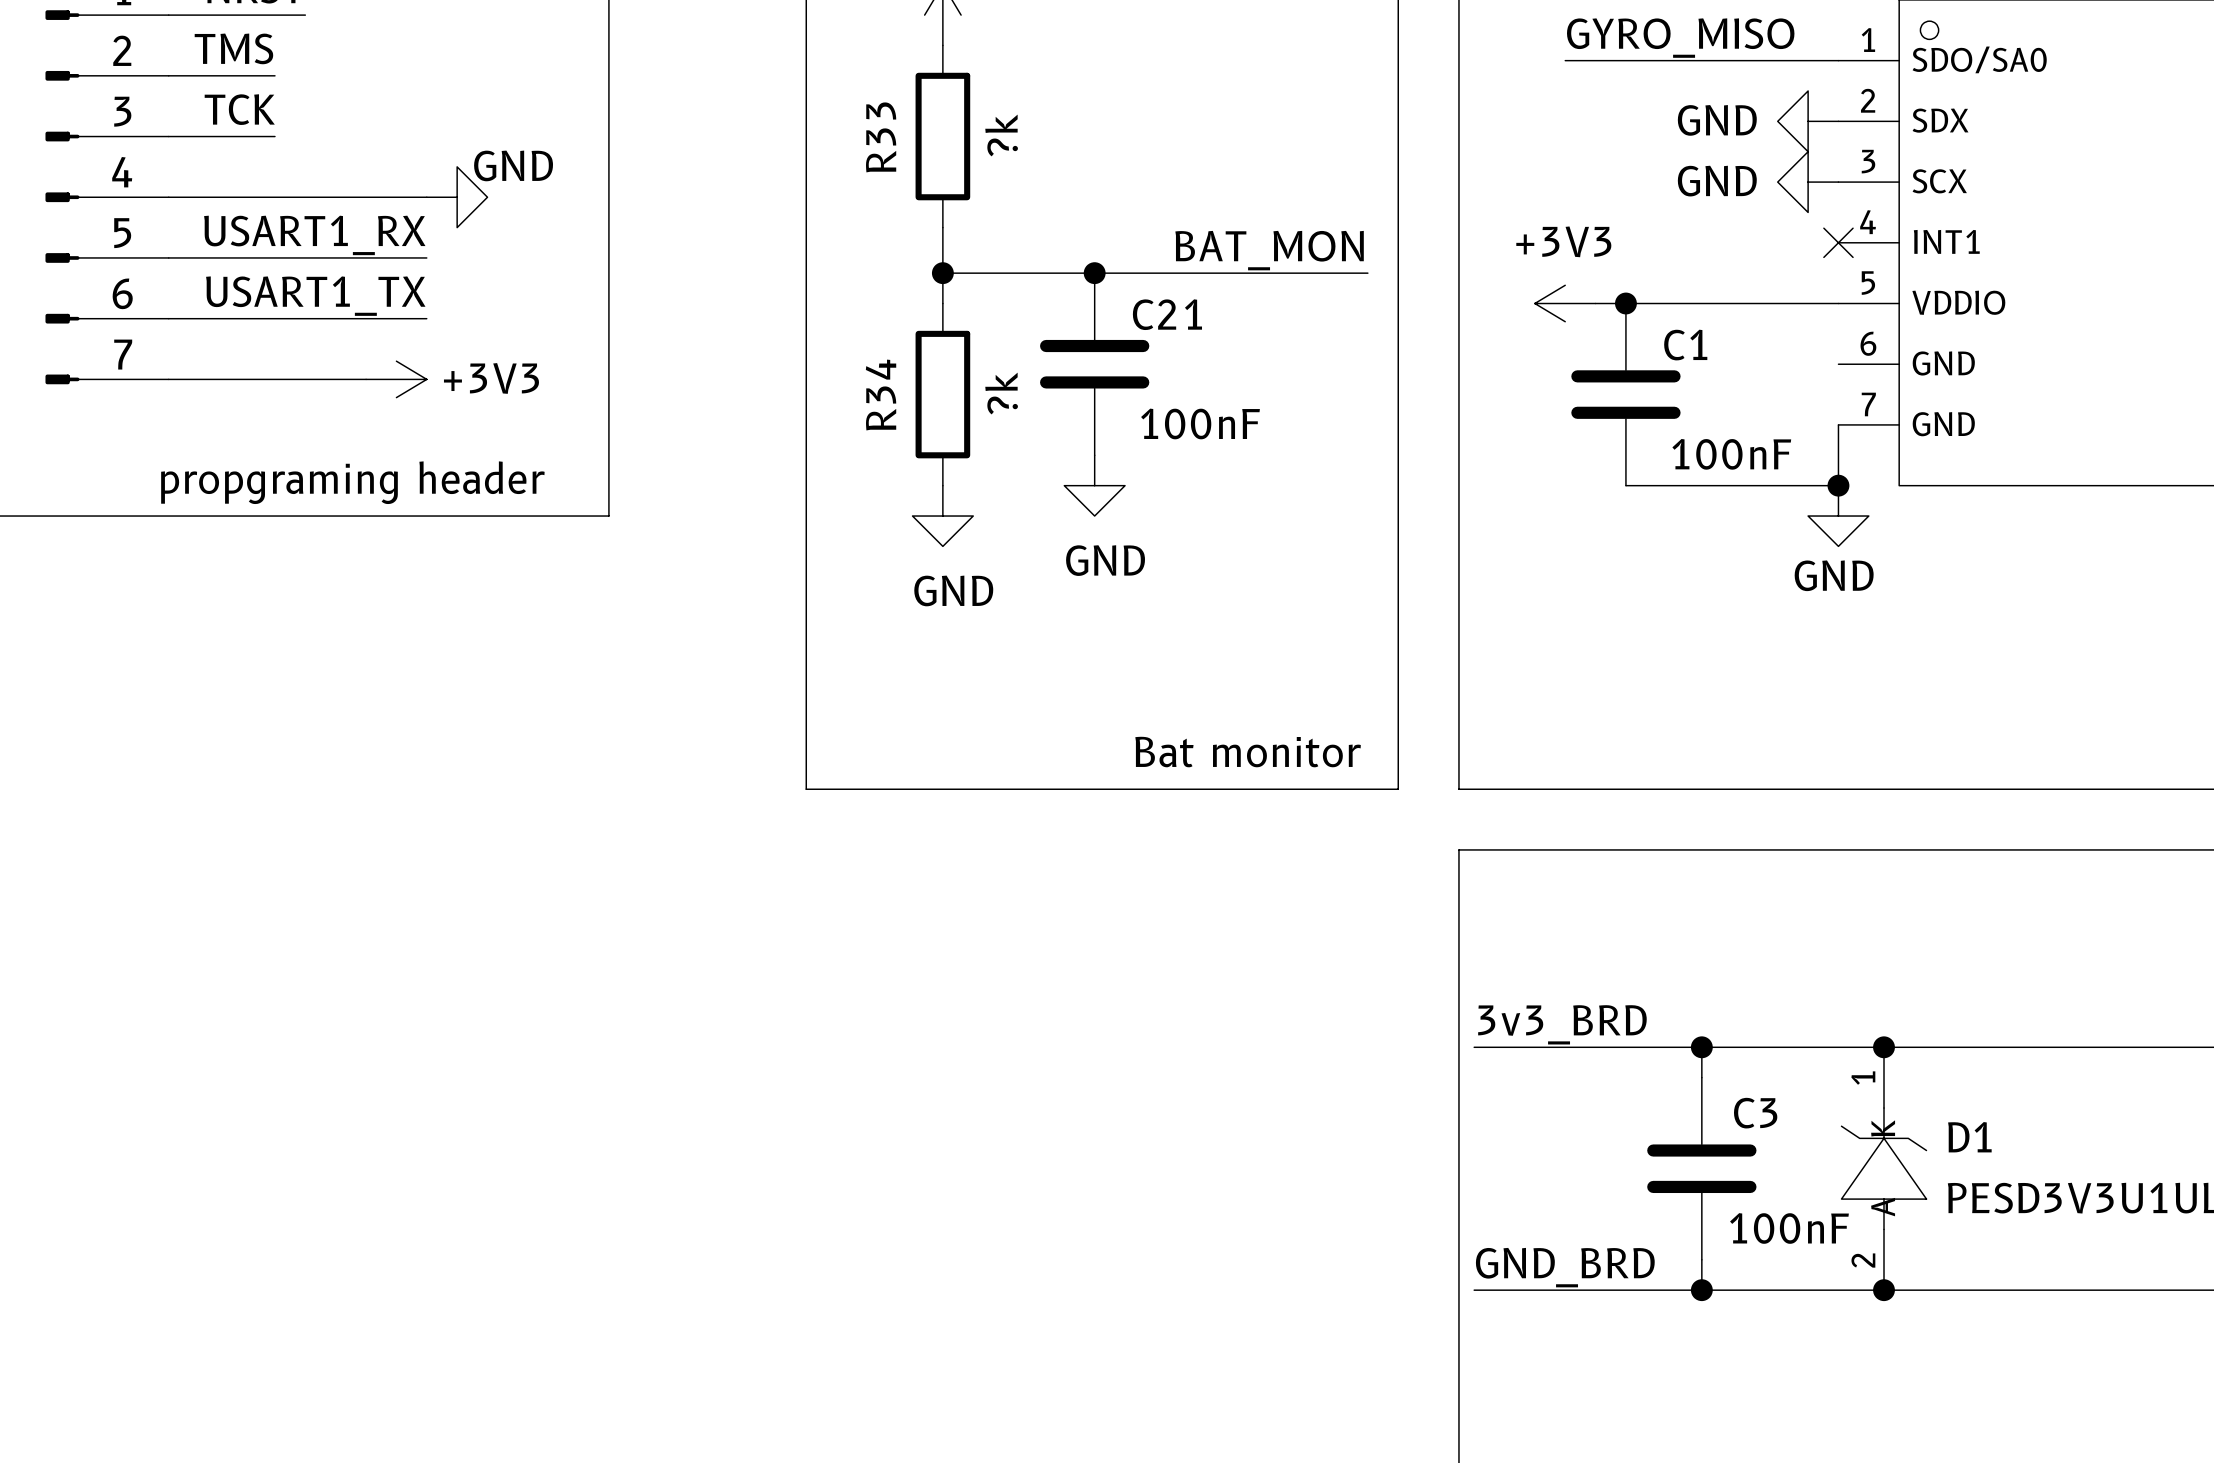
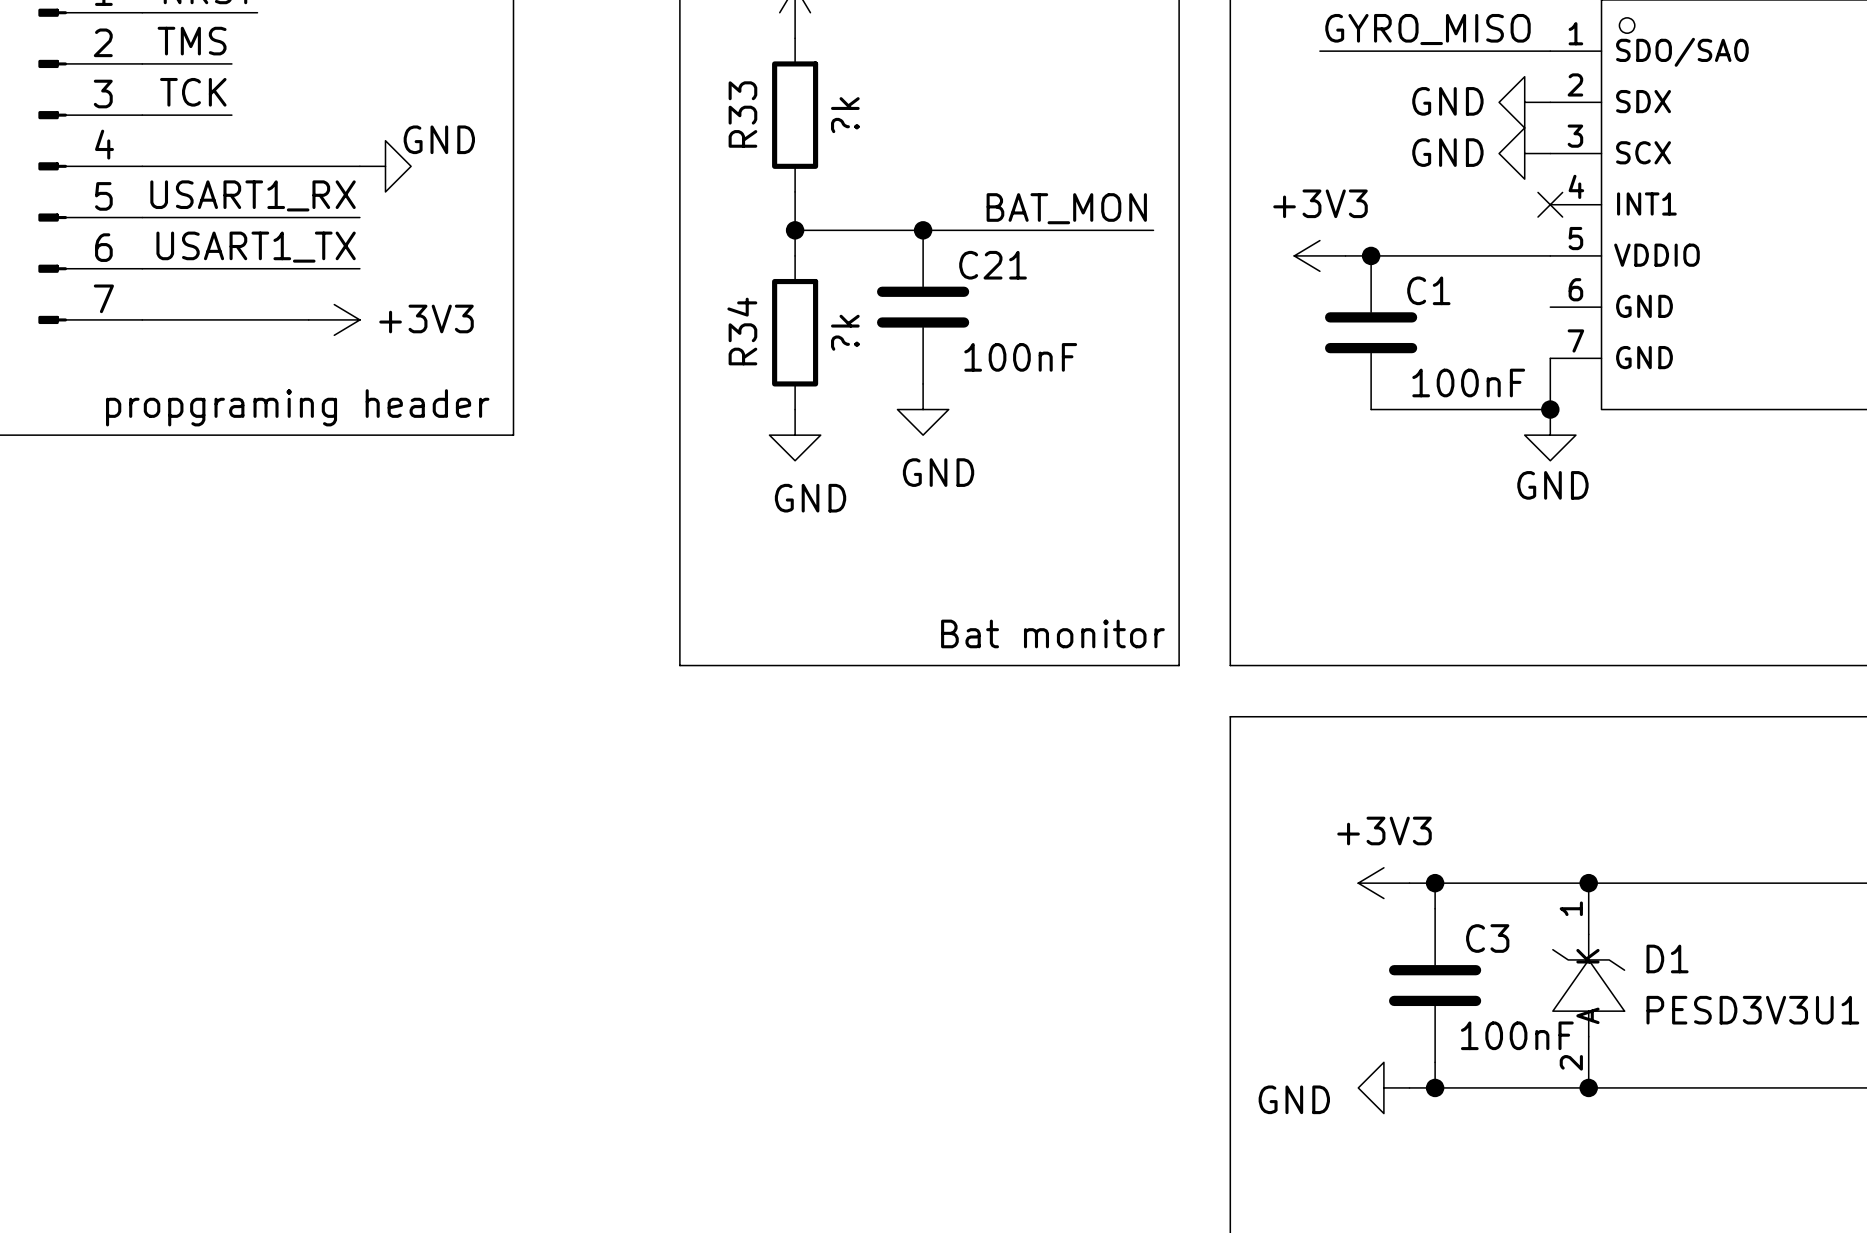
label: 3v3_BRD (1562, 1024) -> none
wire: (1474, 1047) (1671, 1047) -> none
power symbol: none -> +3V3 (1383, 883)
label: GND_BRD (1565, 1267) -> none
wire: (1474, 1290) (1671, 1290) -> none
power symbol: none -> GND (1383, 1087)

